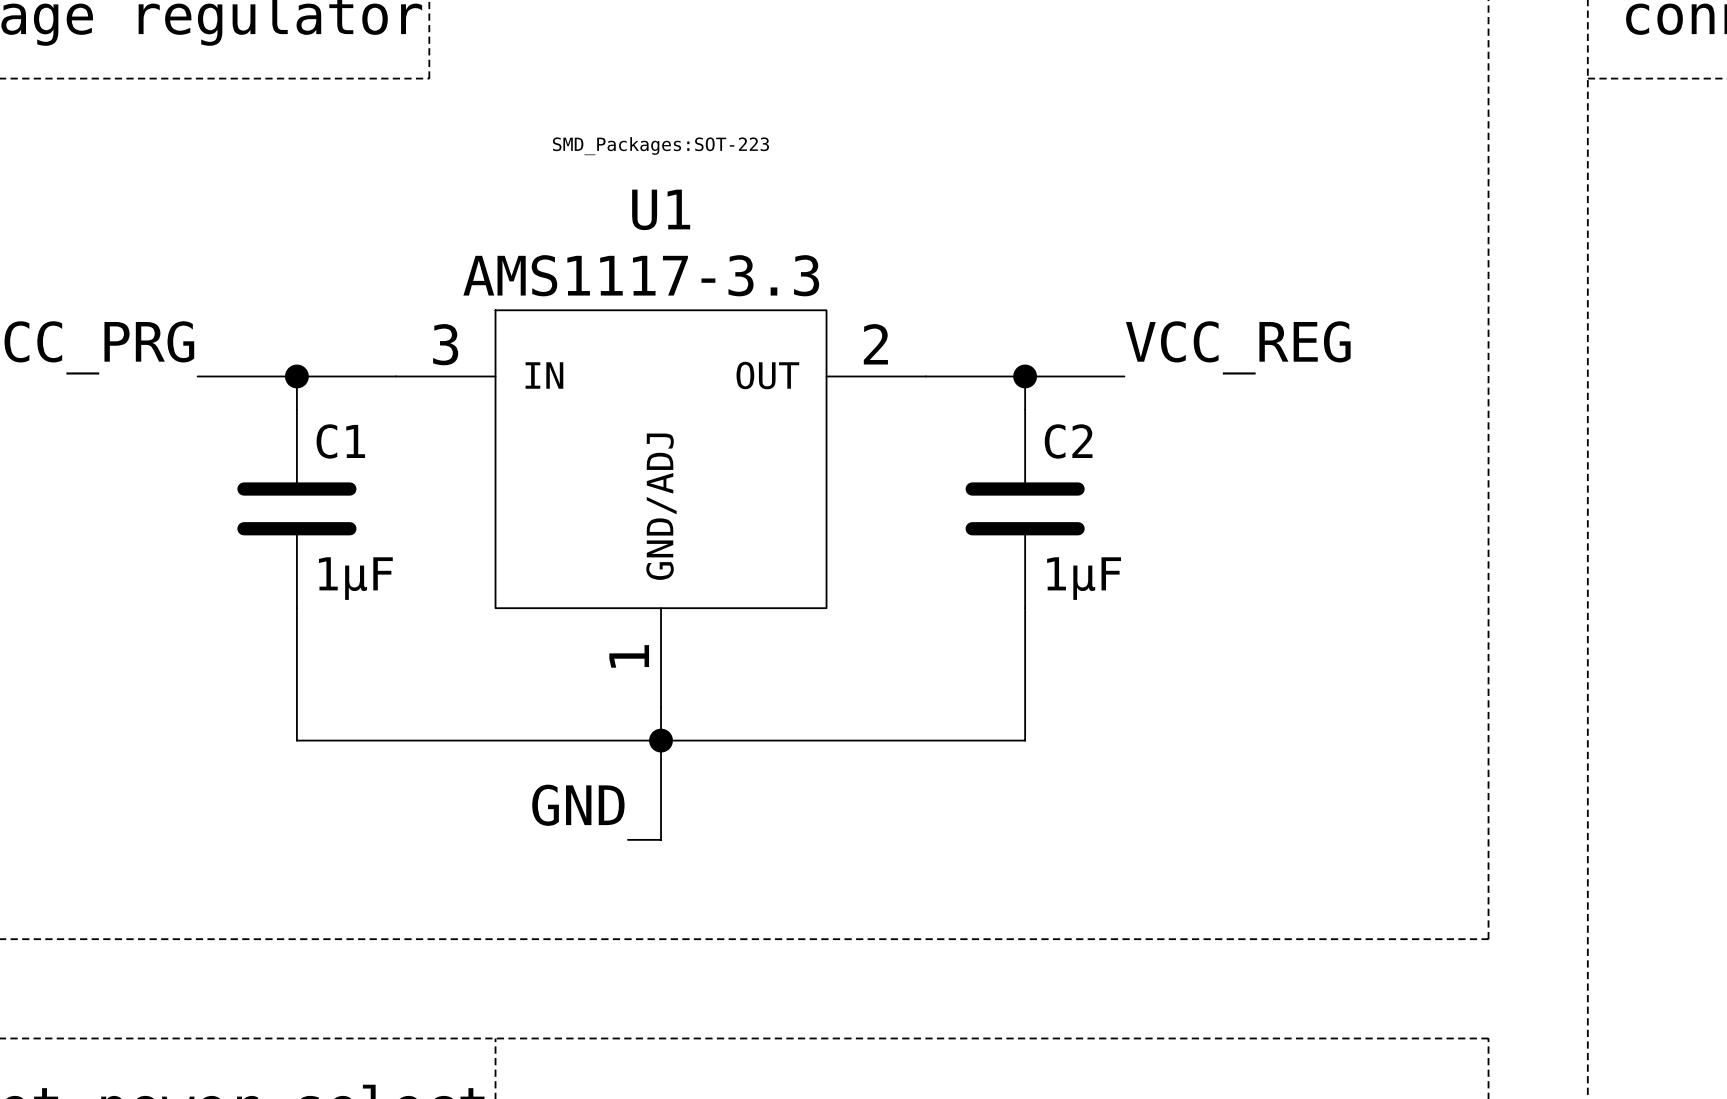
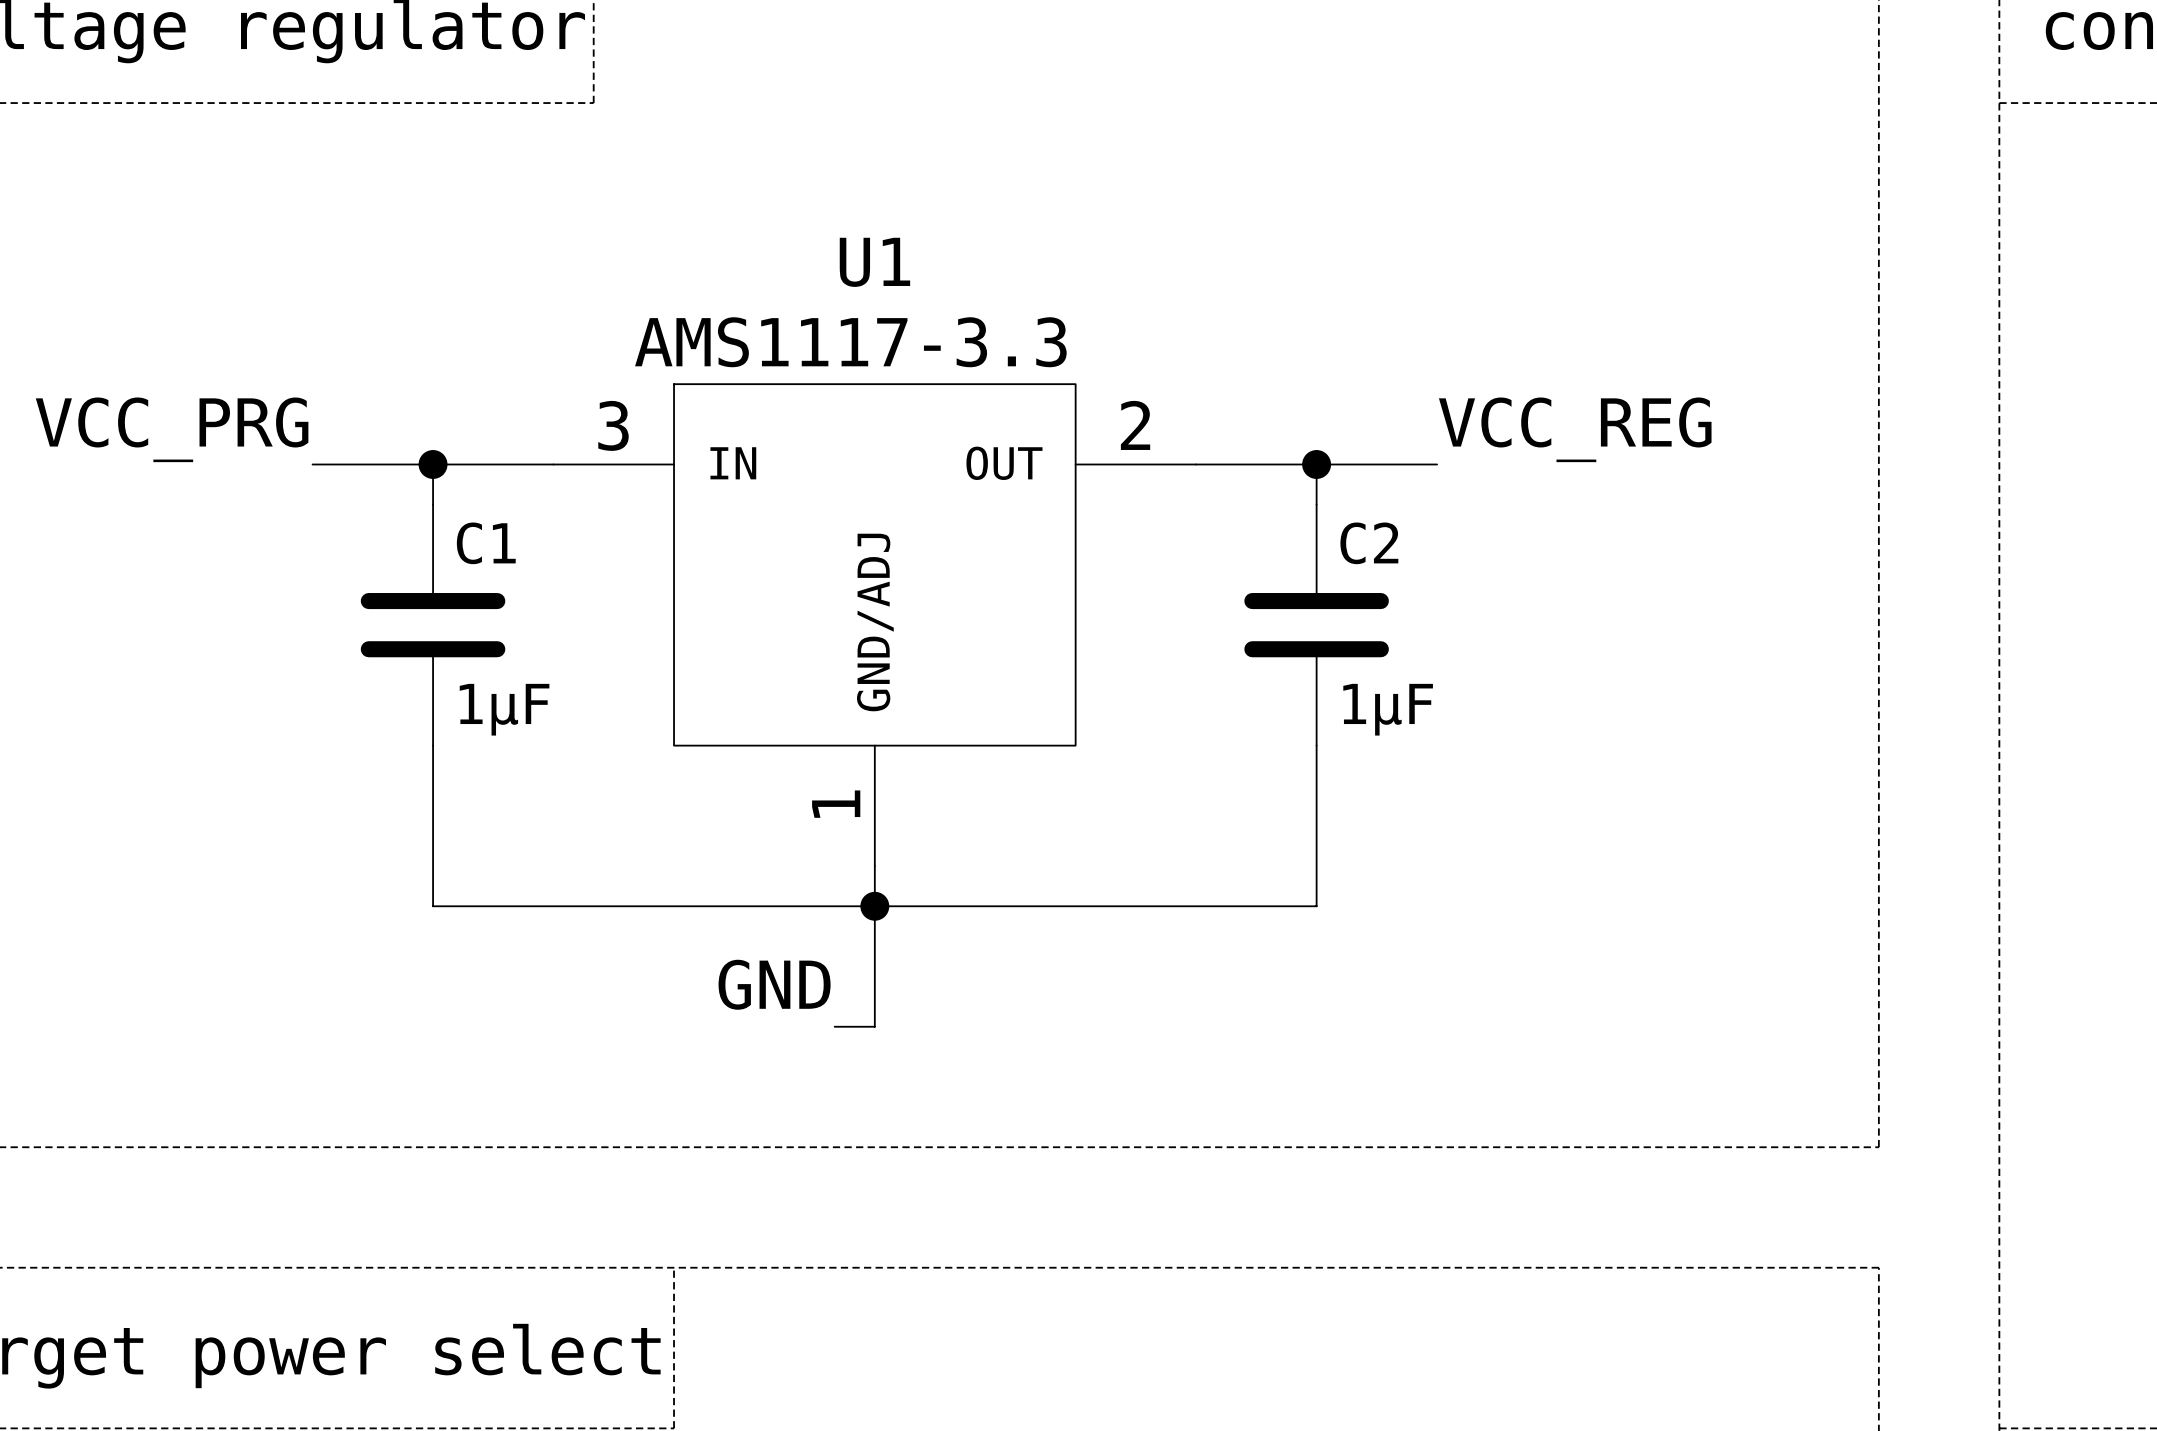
U1 text: SMD_Packages:SOT-223 (660, 146) -> none

